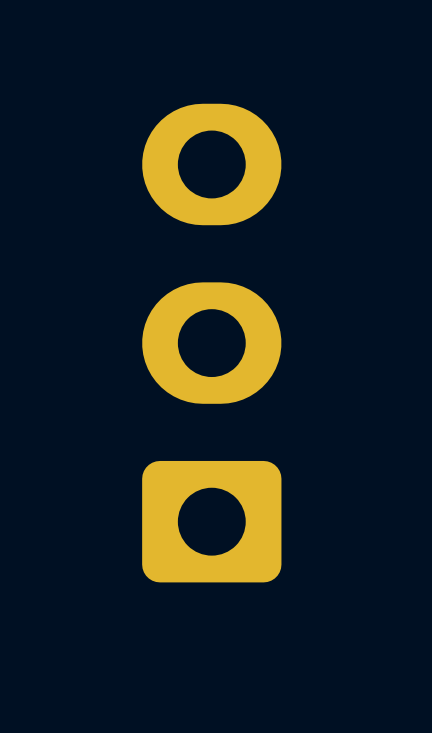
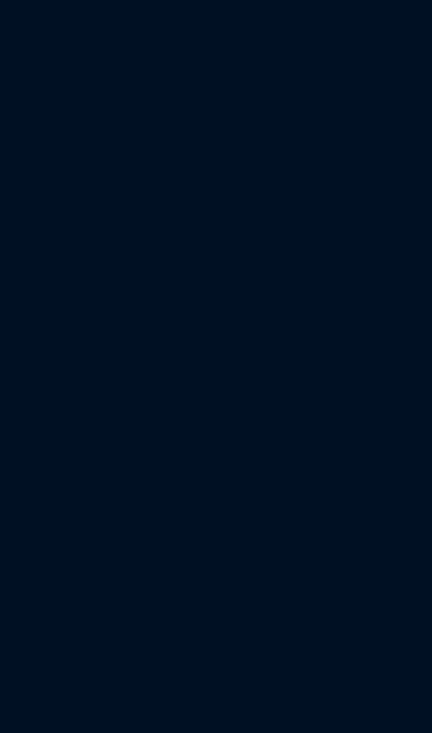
part: (211, 343) -> none

